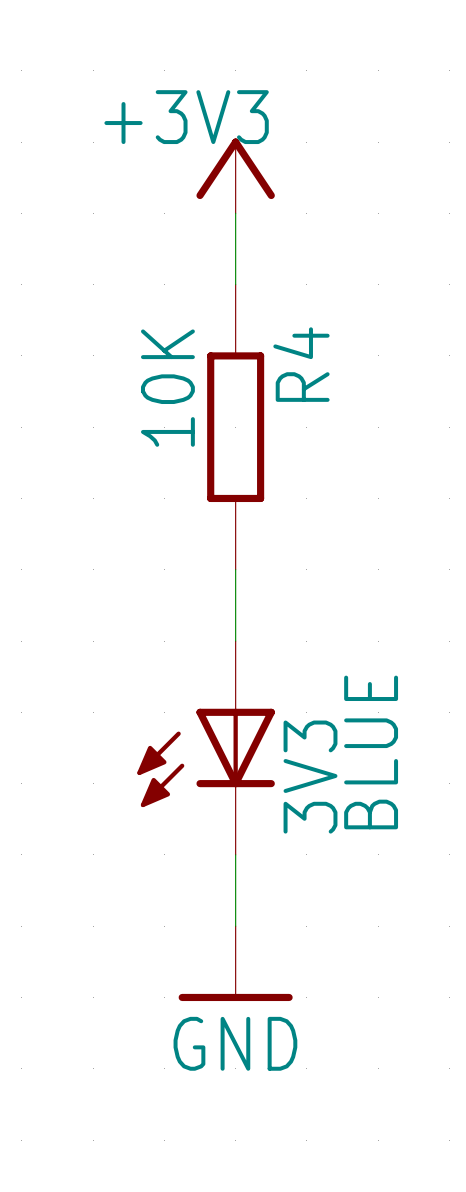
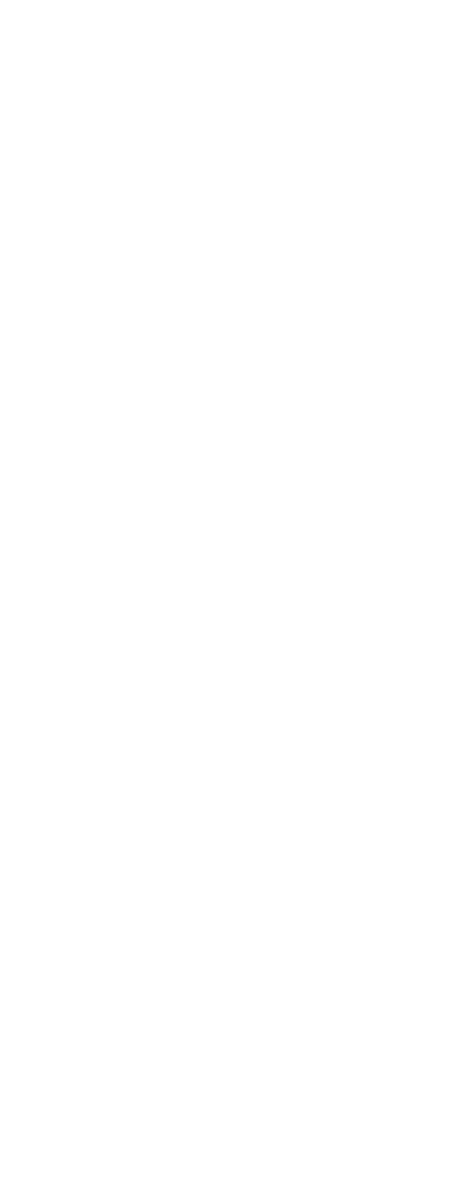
power symbol: +3V3 (235, 175) -> none
wire: (235, 213) (235, 284) -> none
R4: 10K (235, 427) -> none
wire: (235, 569) (235, 641) -> none
3V3: BLUE (206, 747) -> none
wire: (235, 854) (235, 926) -> none
power symbol: GND (235, 963) -> none

